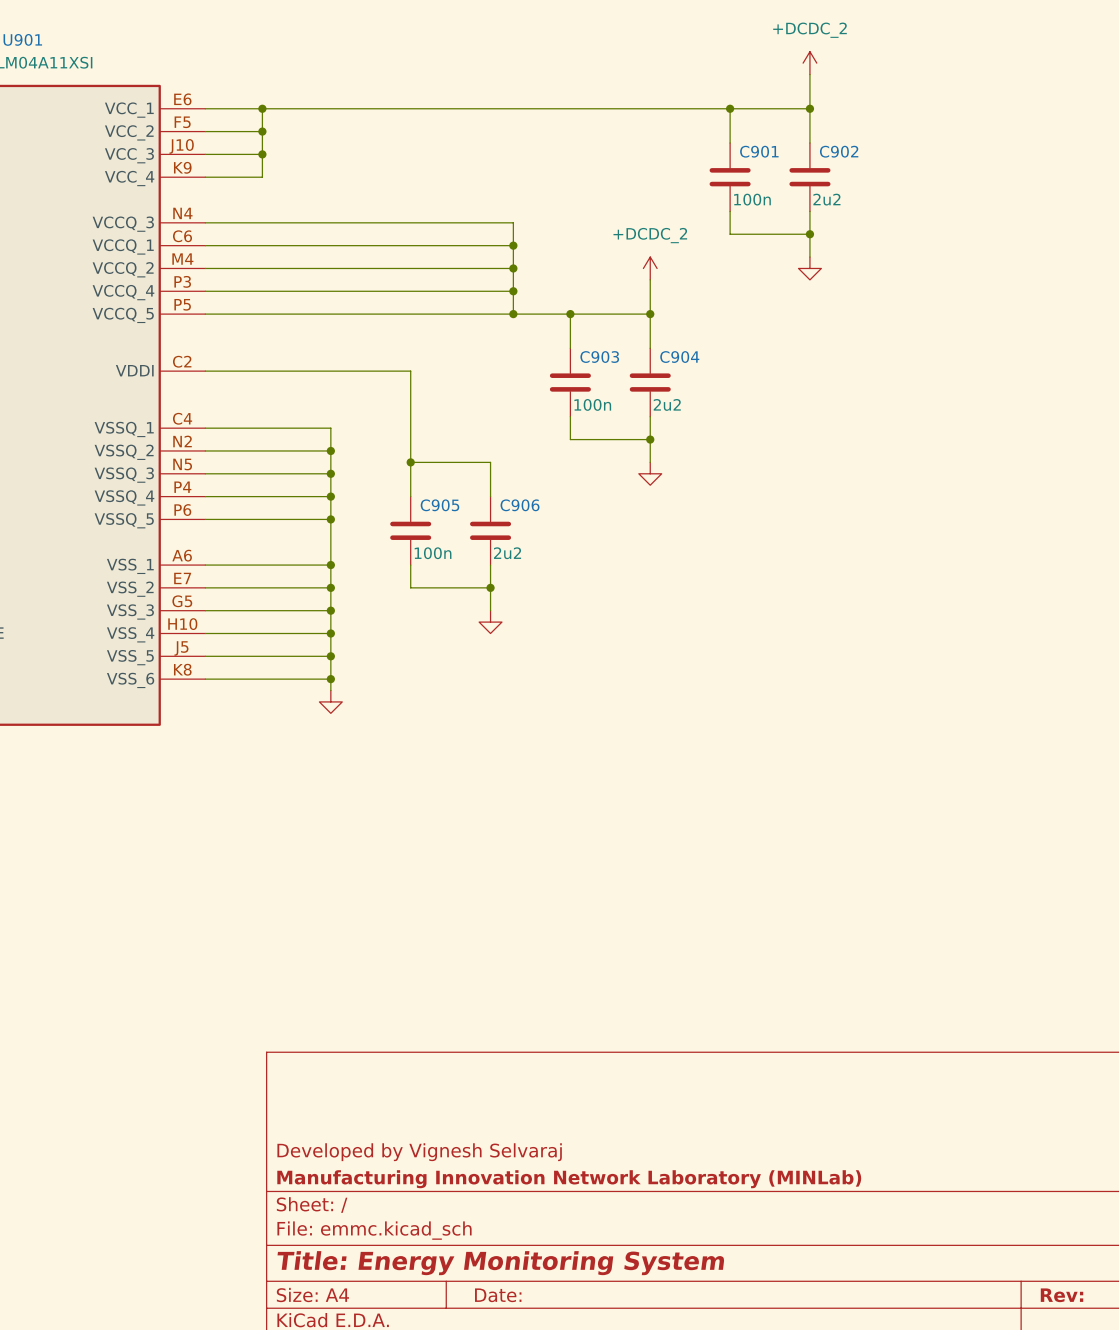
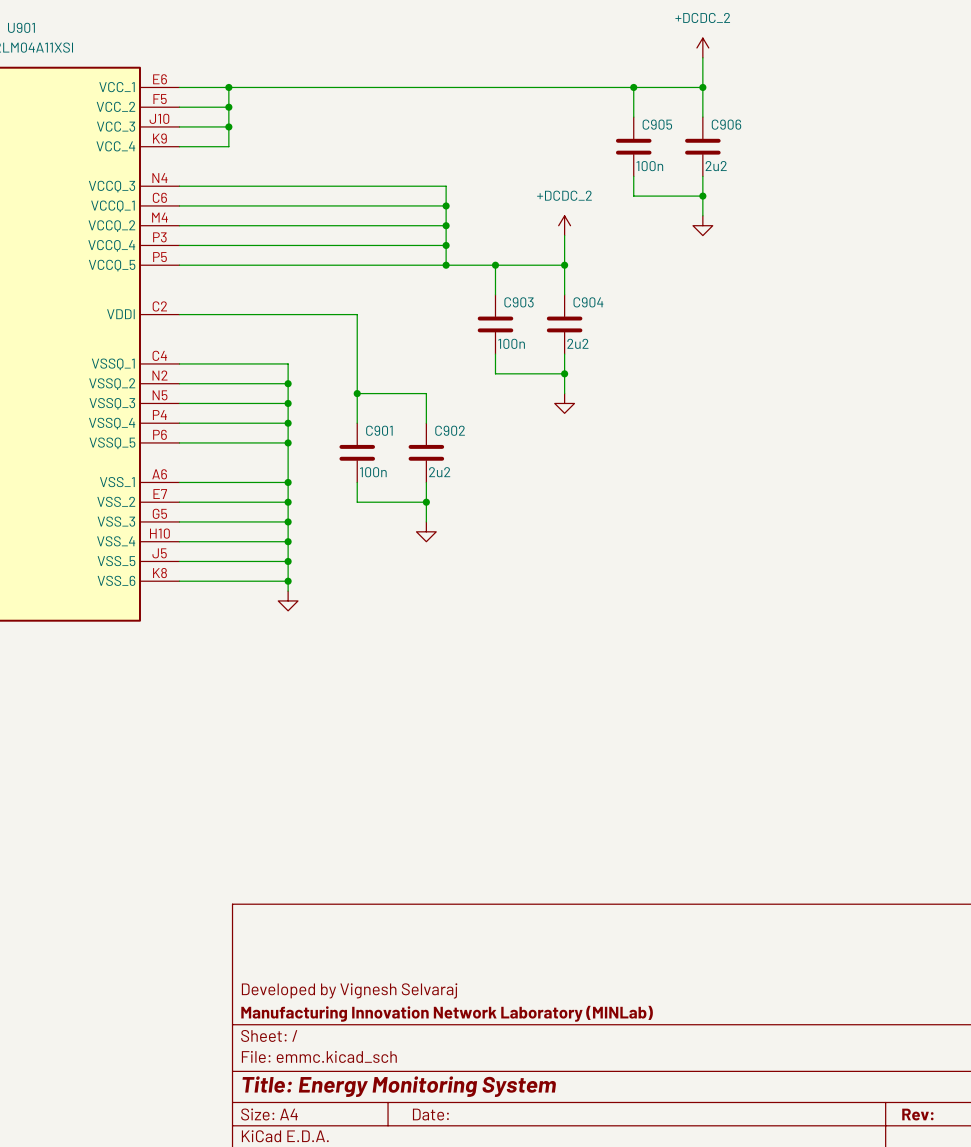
C901 name: C901 (759, 151) -> C905 (657, 124)
C902 name: C902 (839, 151) -> C906 (726, 124)
C905 name: C905 (439, 505) -> C901 (379, 430)
C906 name: C906 (520, 505) -> C902 (450, 430)

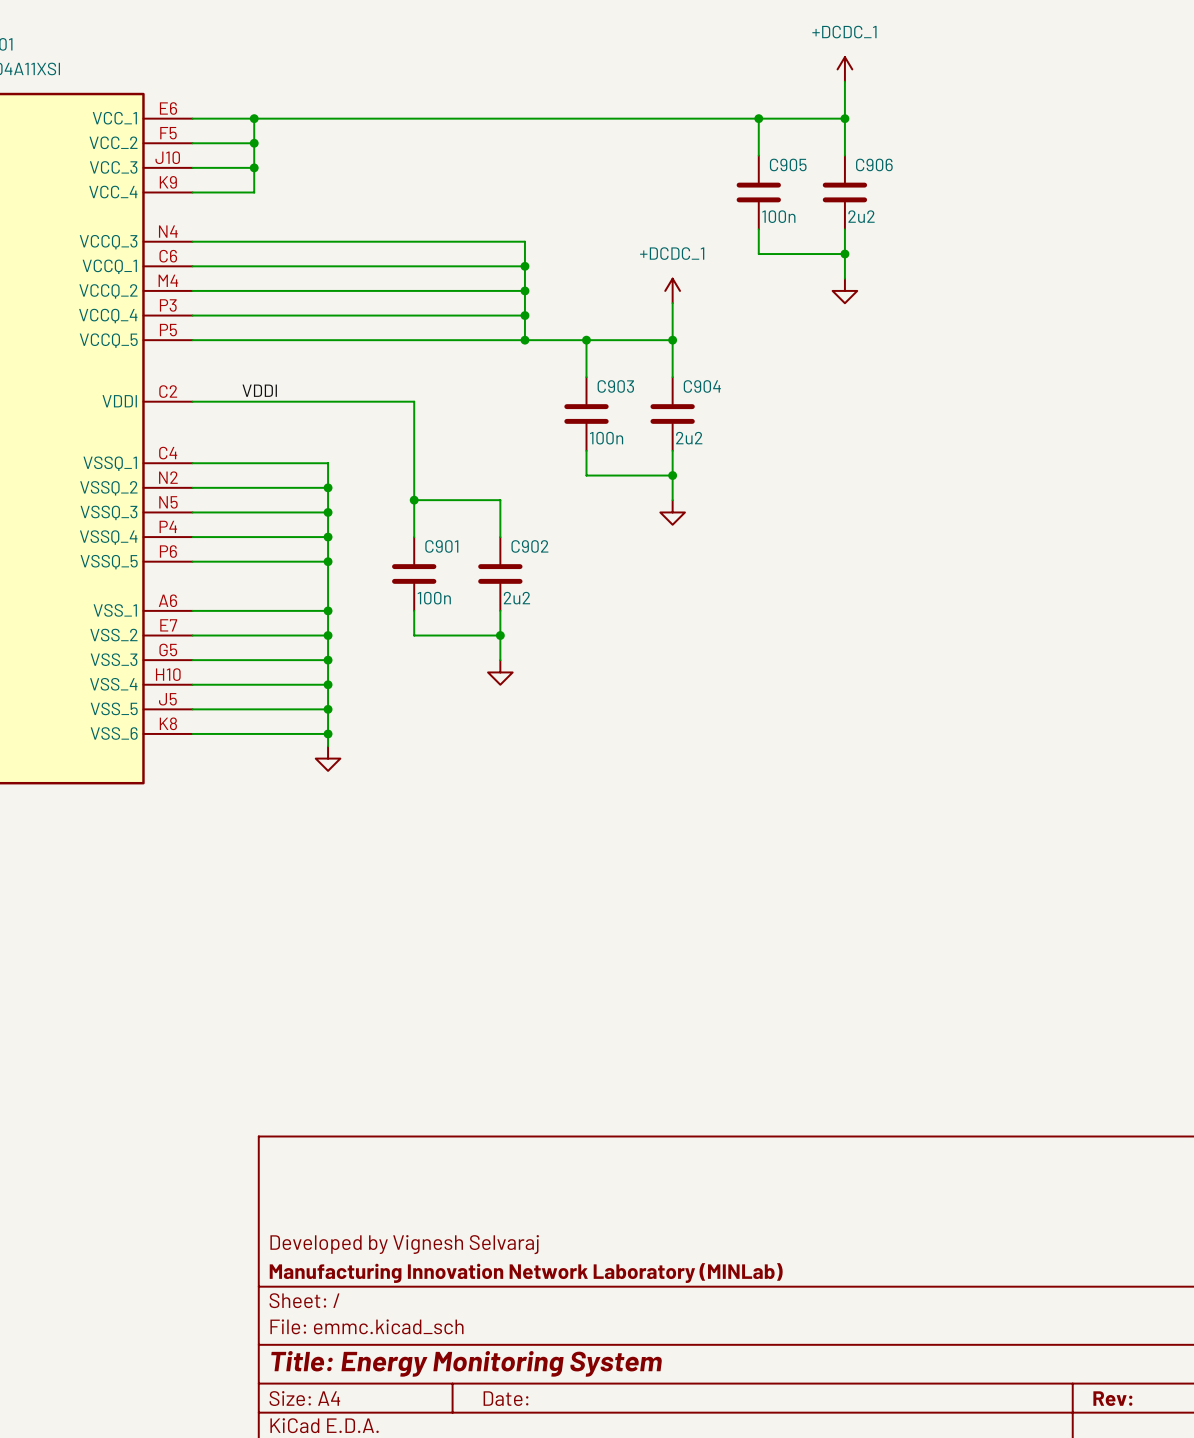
power symbol: +DCDC_2 (702, 47) -> +DCDC_1 (844, 69)
power symbol: +DCDC_2 (564, 225) -> +DCDC_1 (672, 290)
label: none -> VDDI (259, 390)

